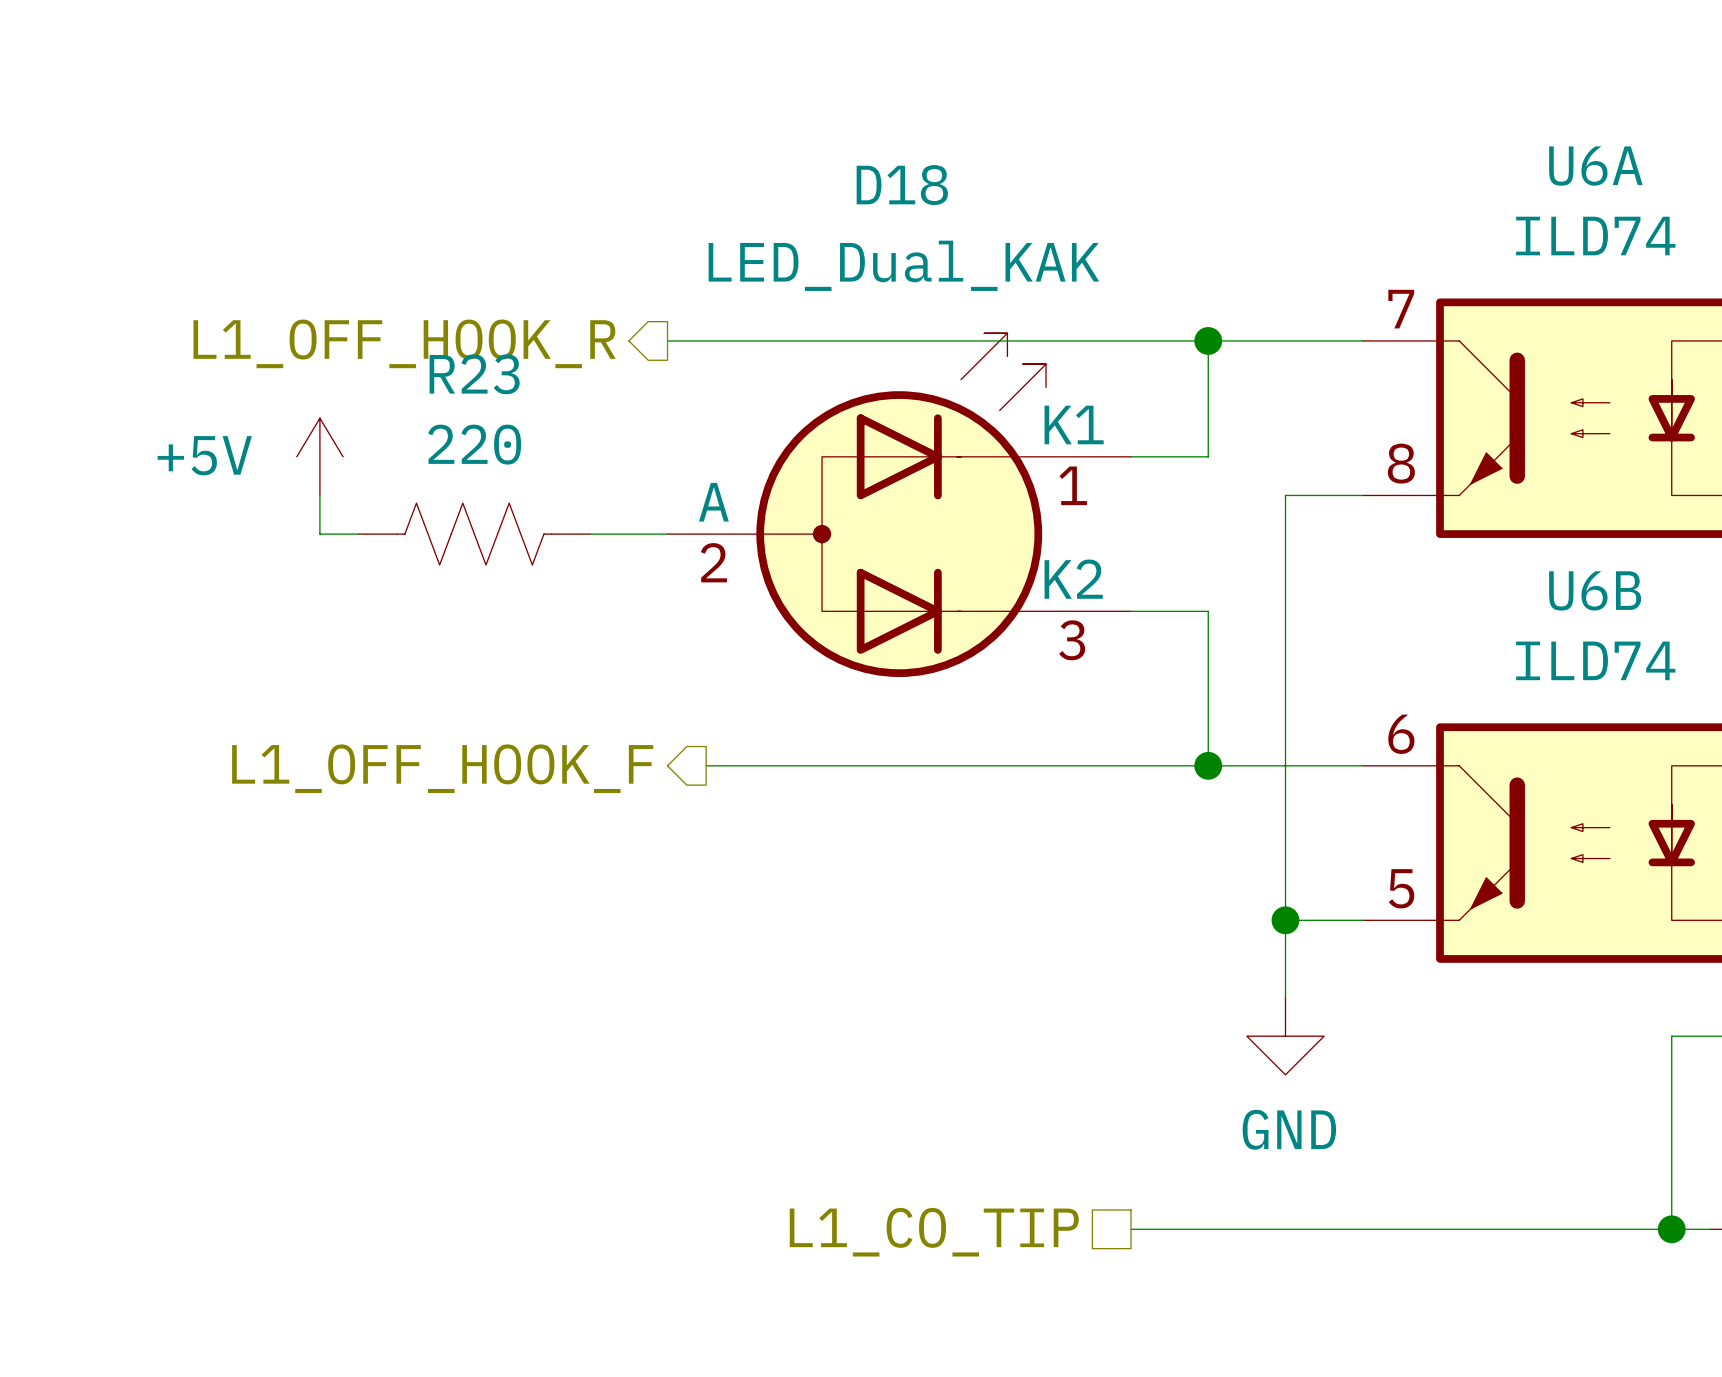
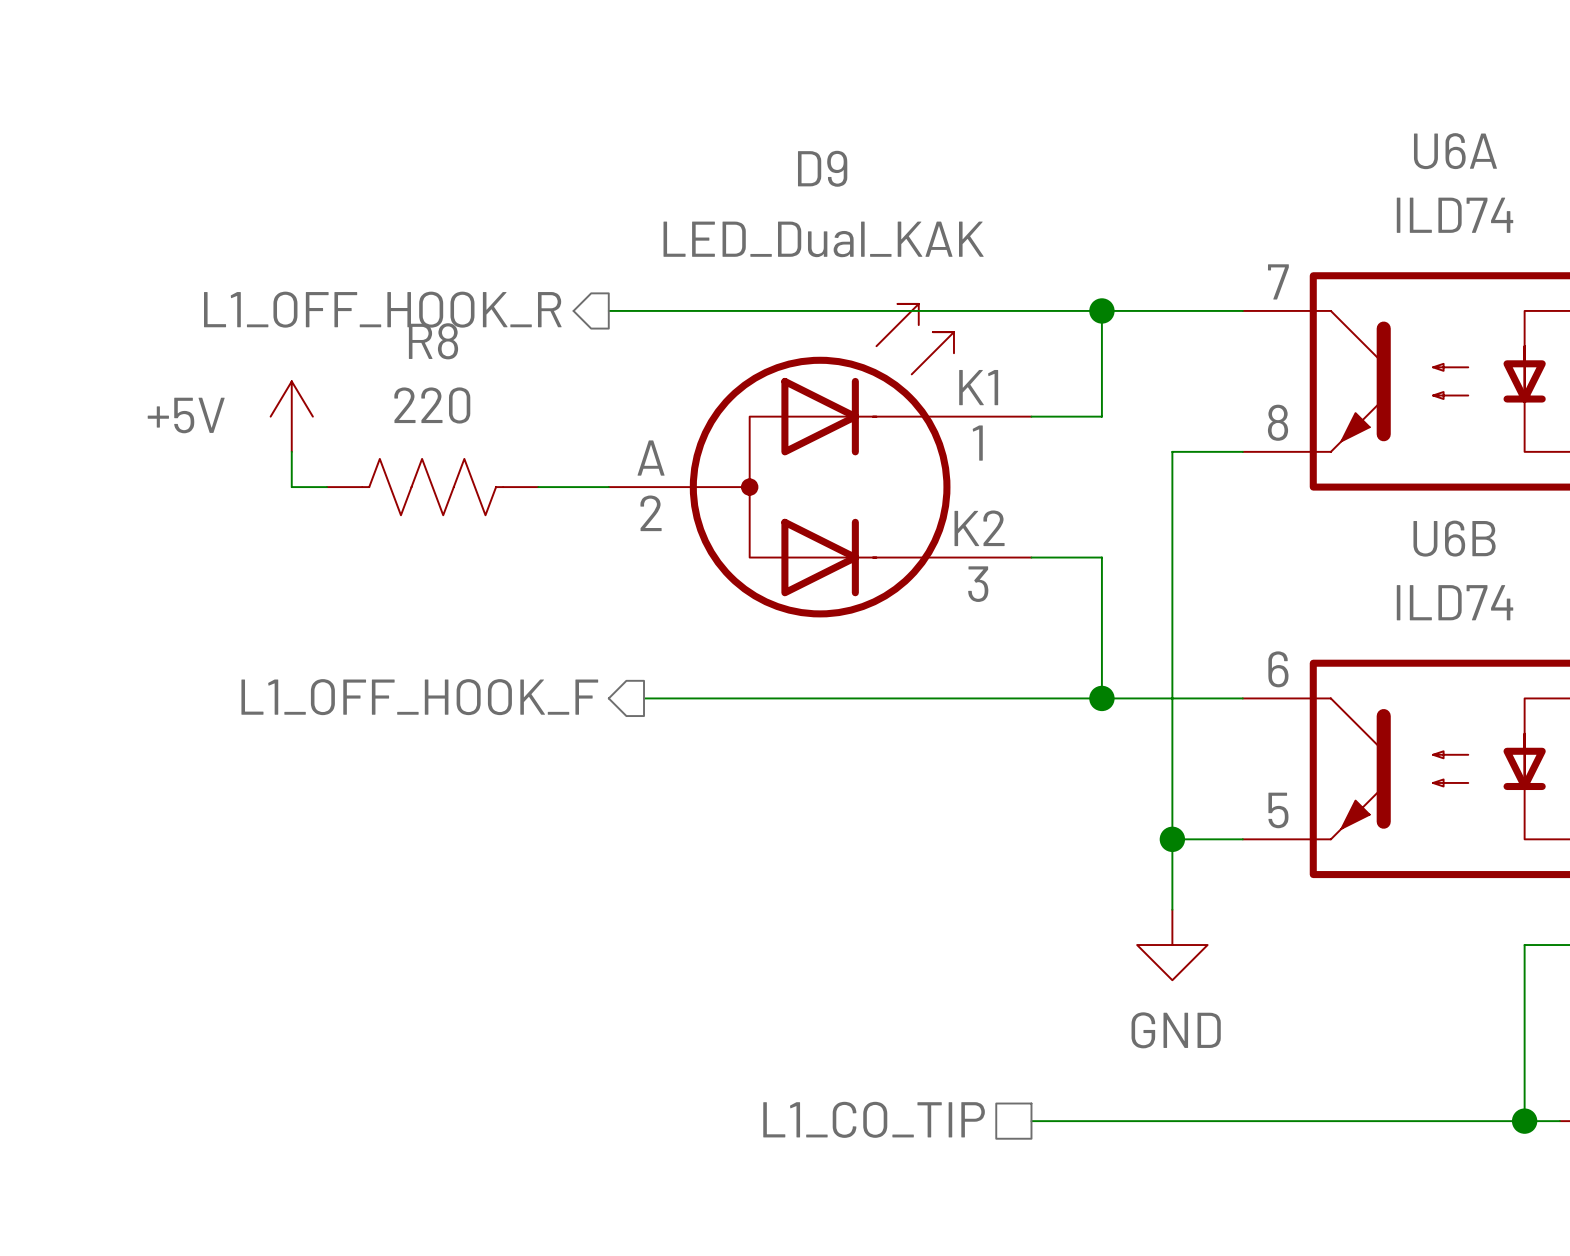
D18 name: D18 (902, 185) -> D9 (822, 168)
R23 name: R23 (474, 374) -> R8 (433, 341)

